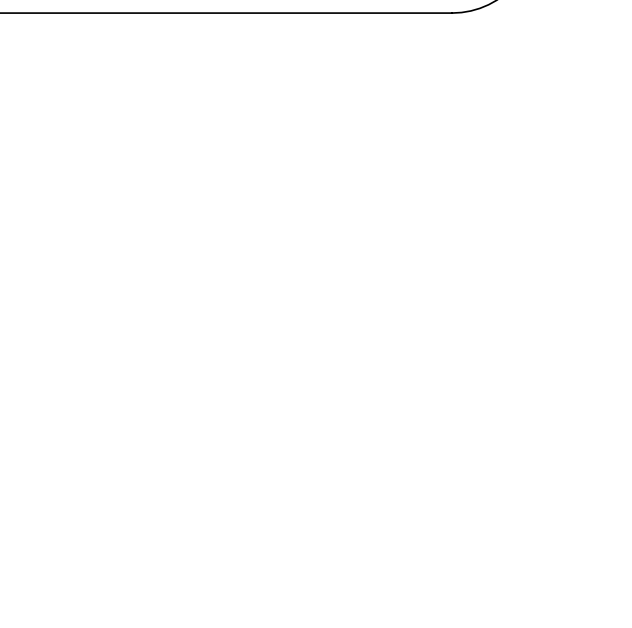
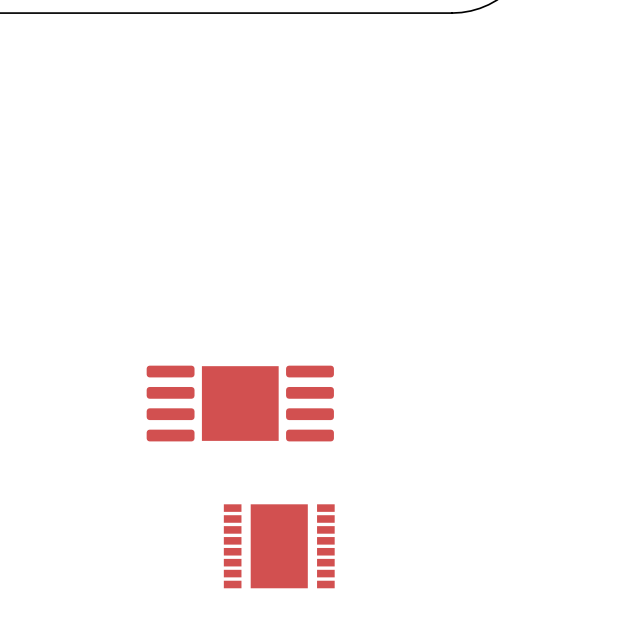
part: none -> (240, 403)
part: none -> (279, 546)

